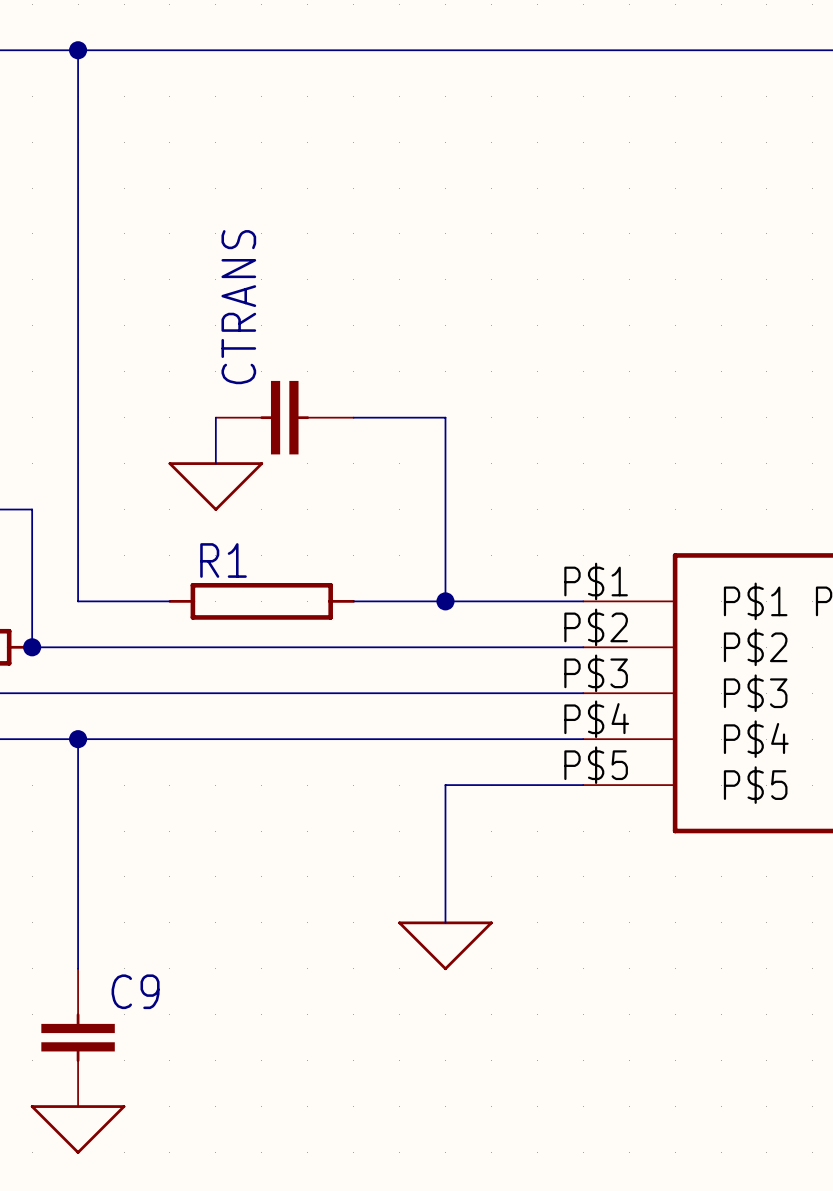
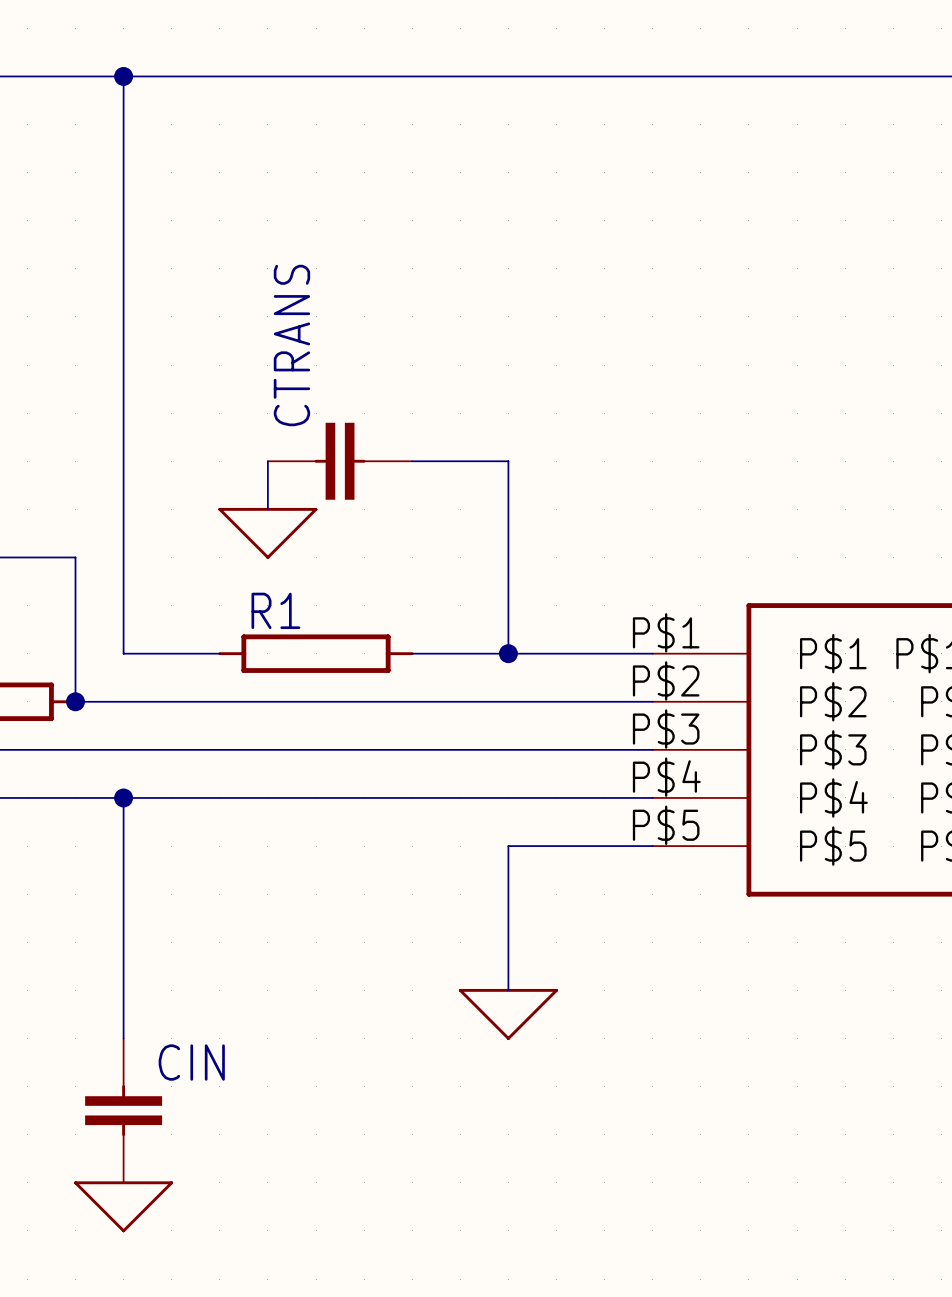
C9 name: C9 (135, 991) -> CIN (191, 1062)

